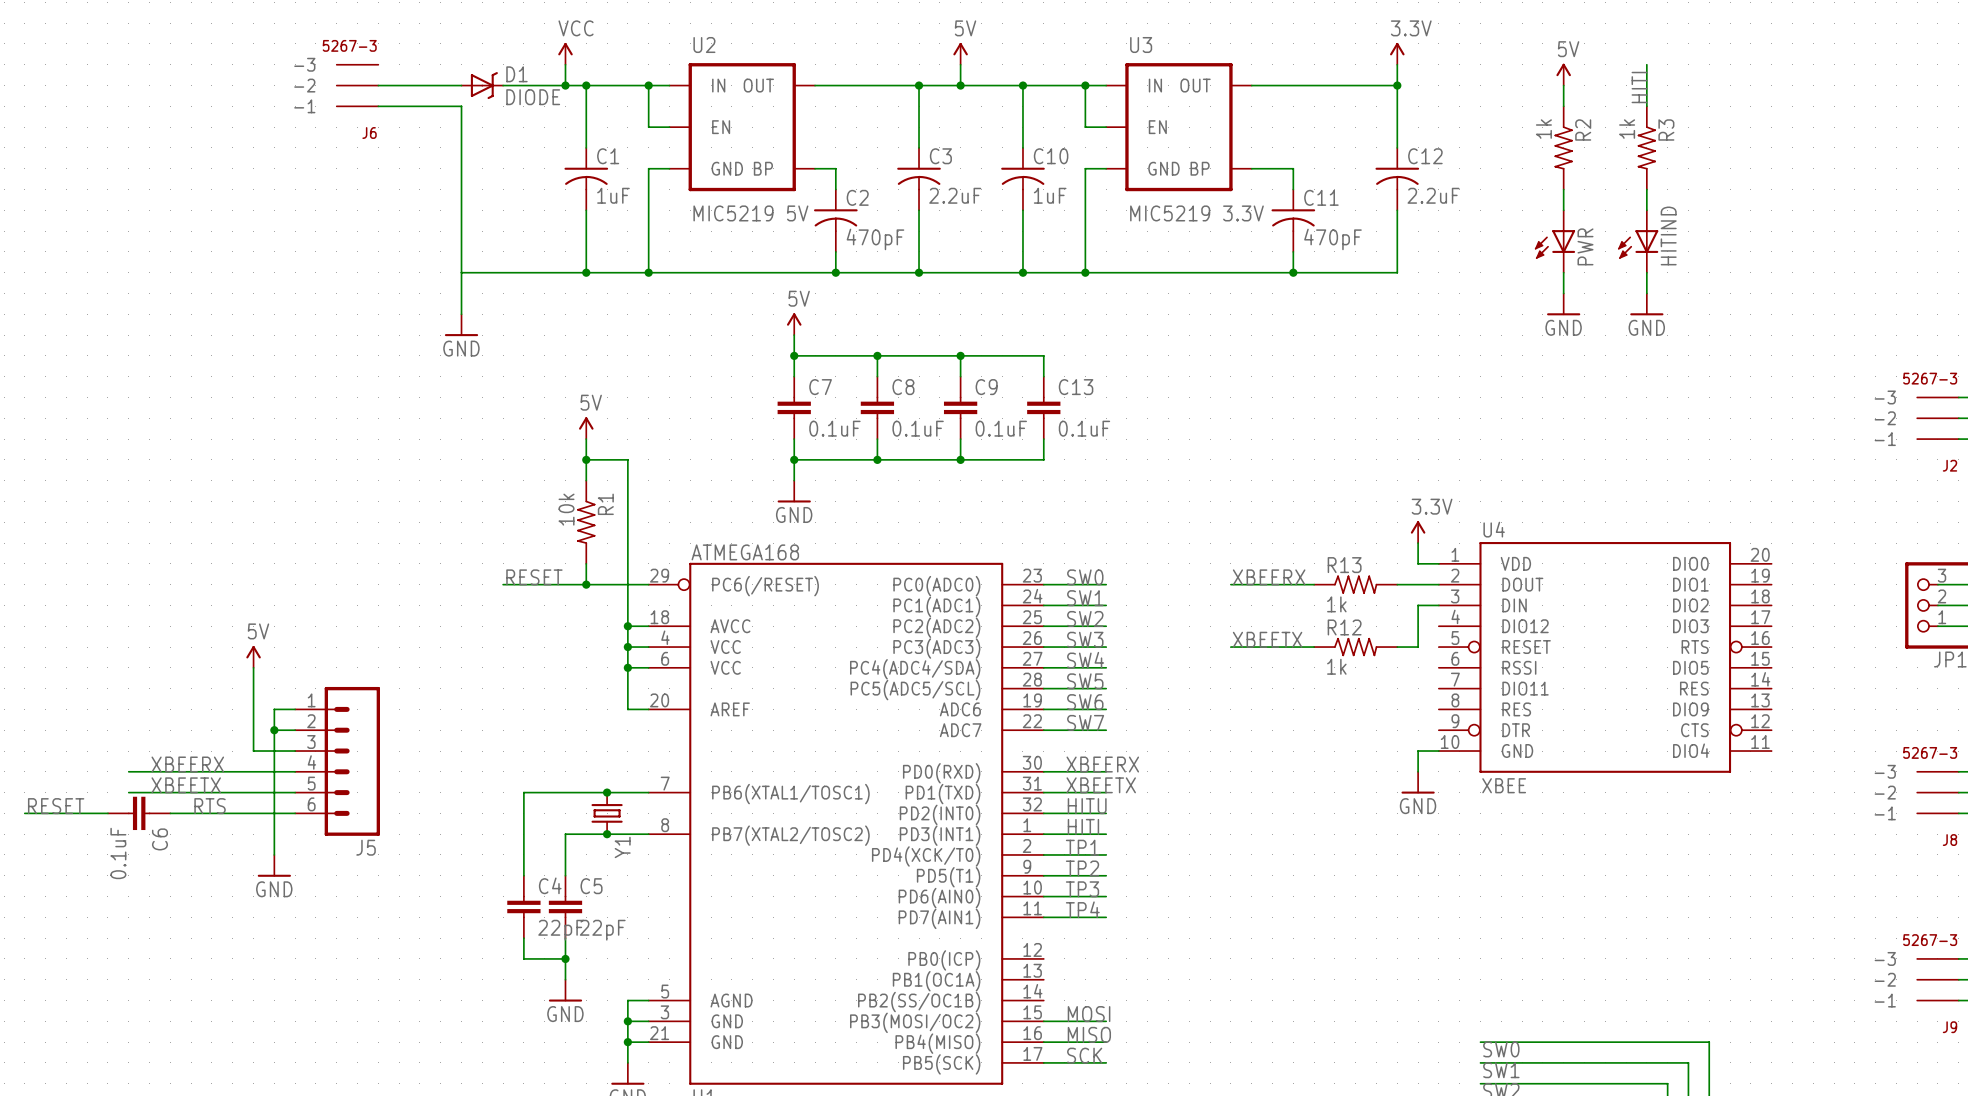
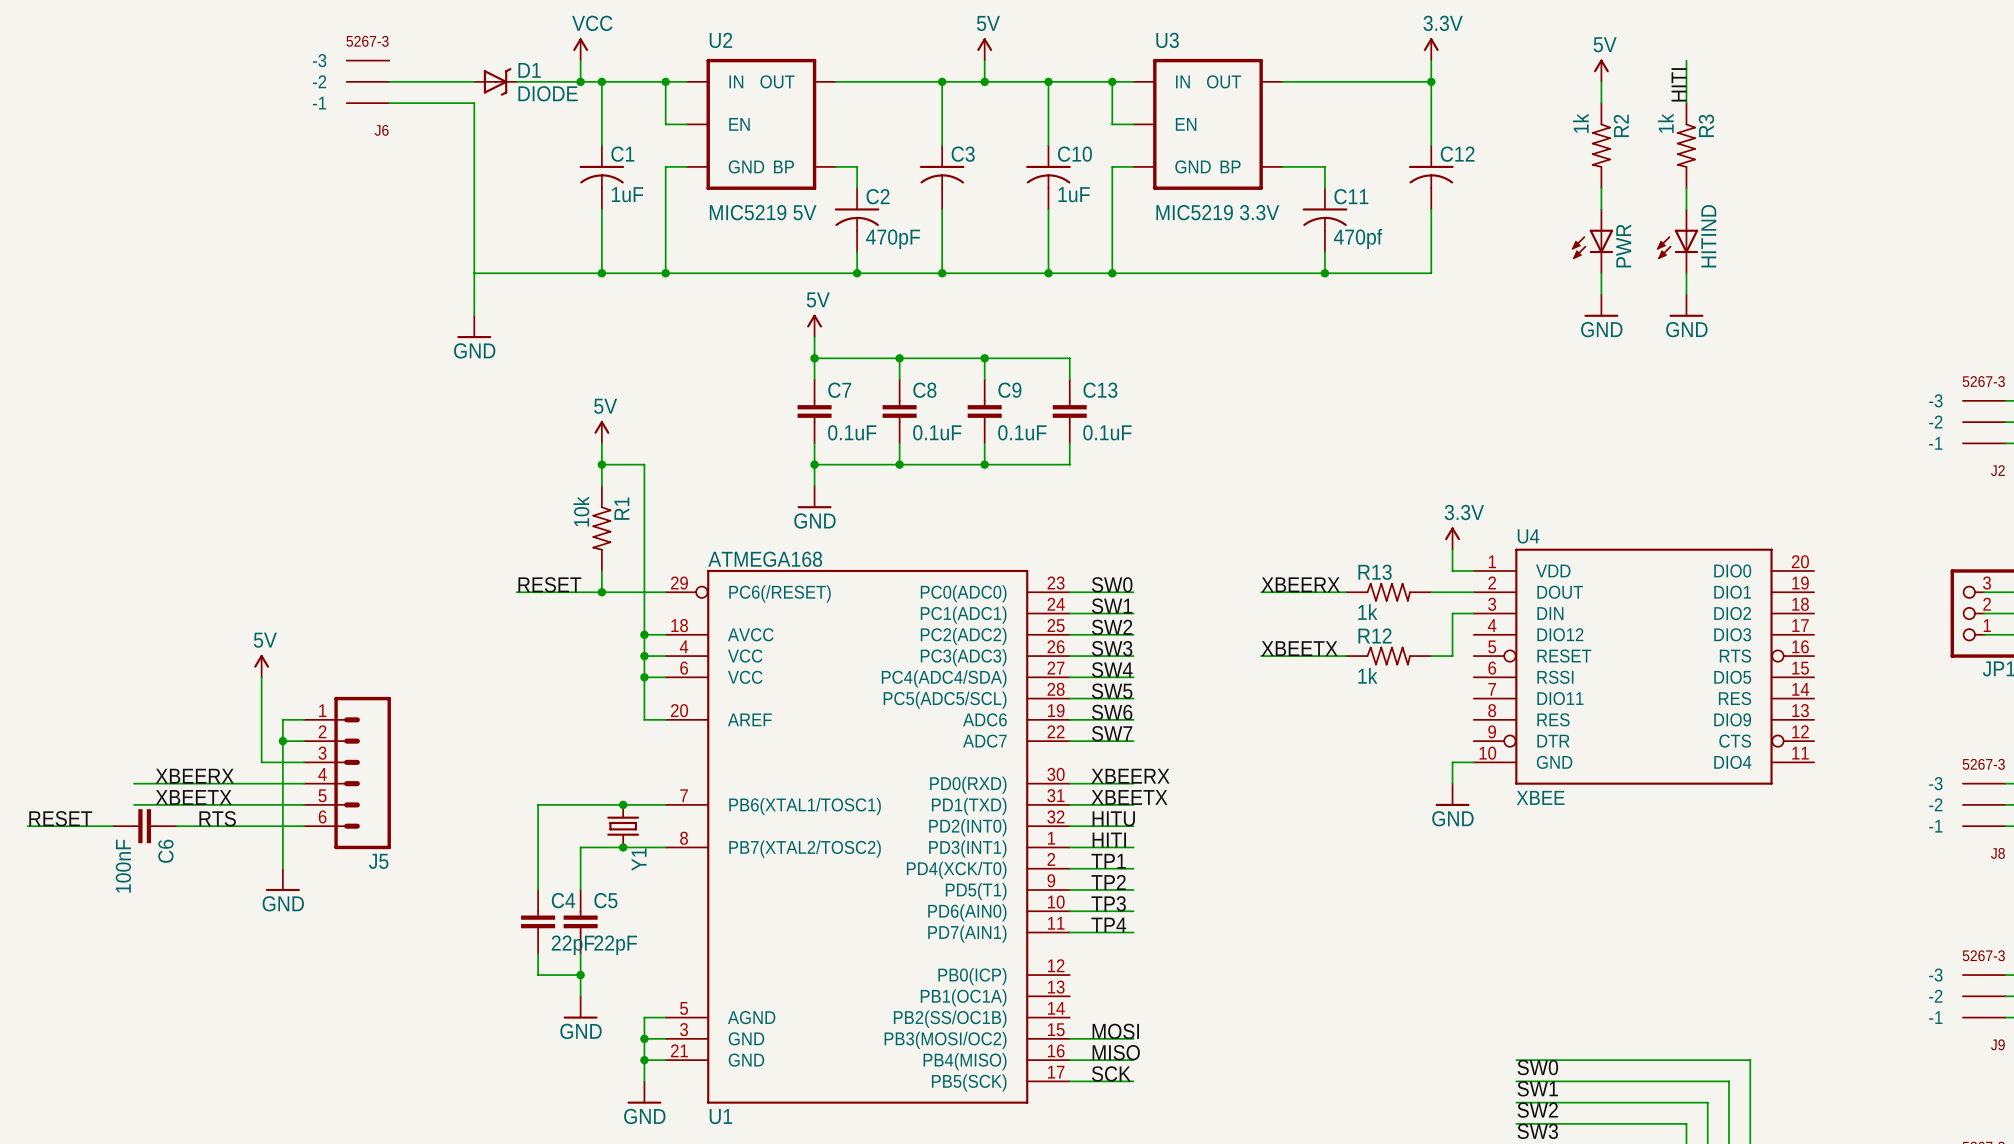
C3 value: 2.2uF (955, 195) -> none
C12 value: 2.2uF (1433, 195) -> none
C11 value: 470pF (1332, 239) -> 470pf (1358, 238)
C6 value: 0.1uF (118, 853) -> 100nF (123, 866)

